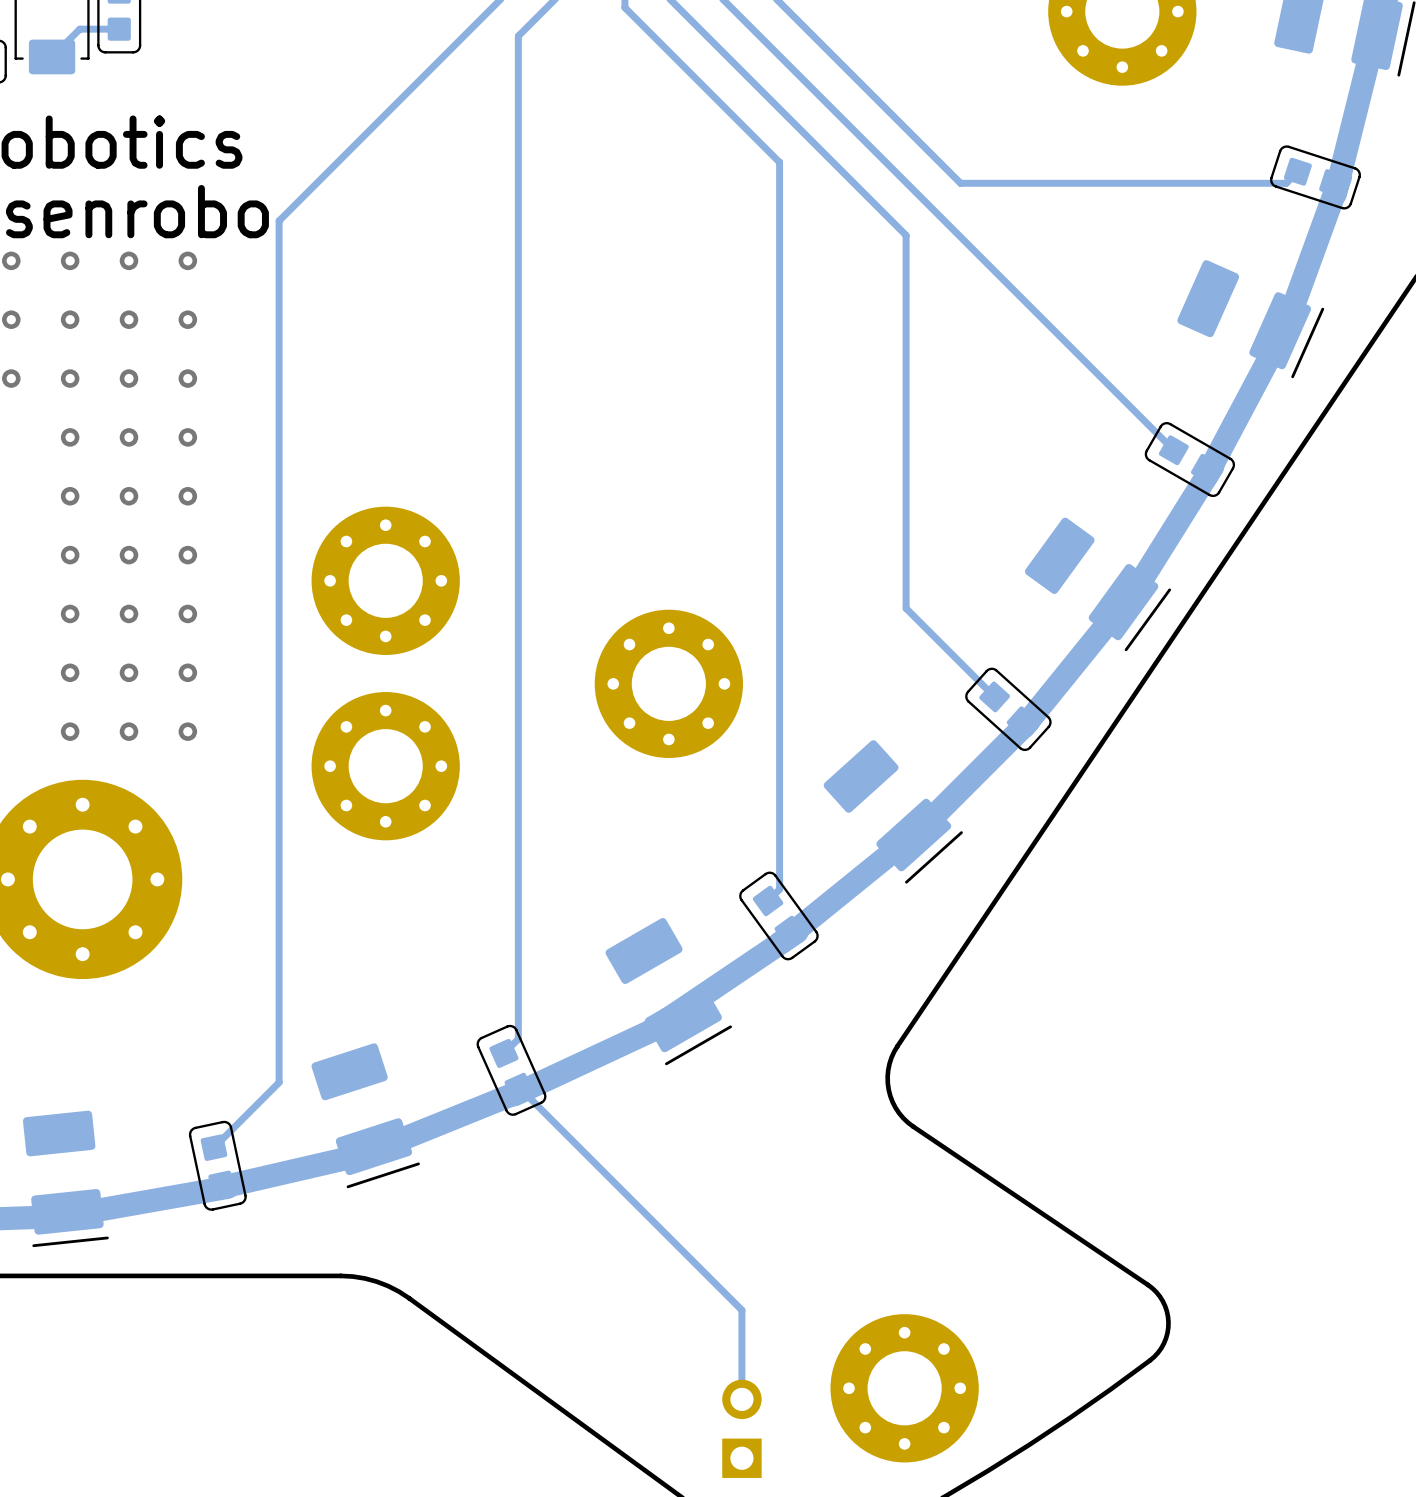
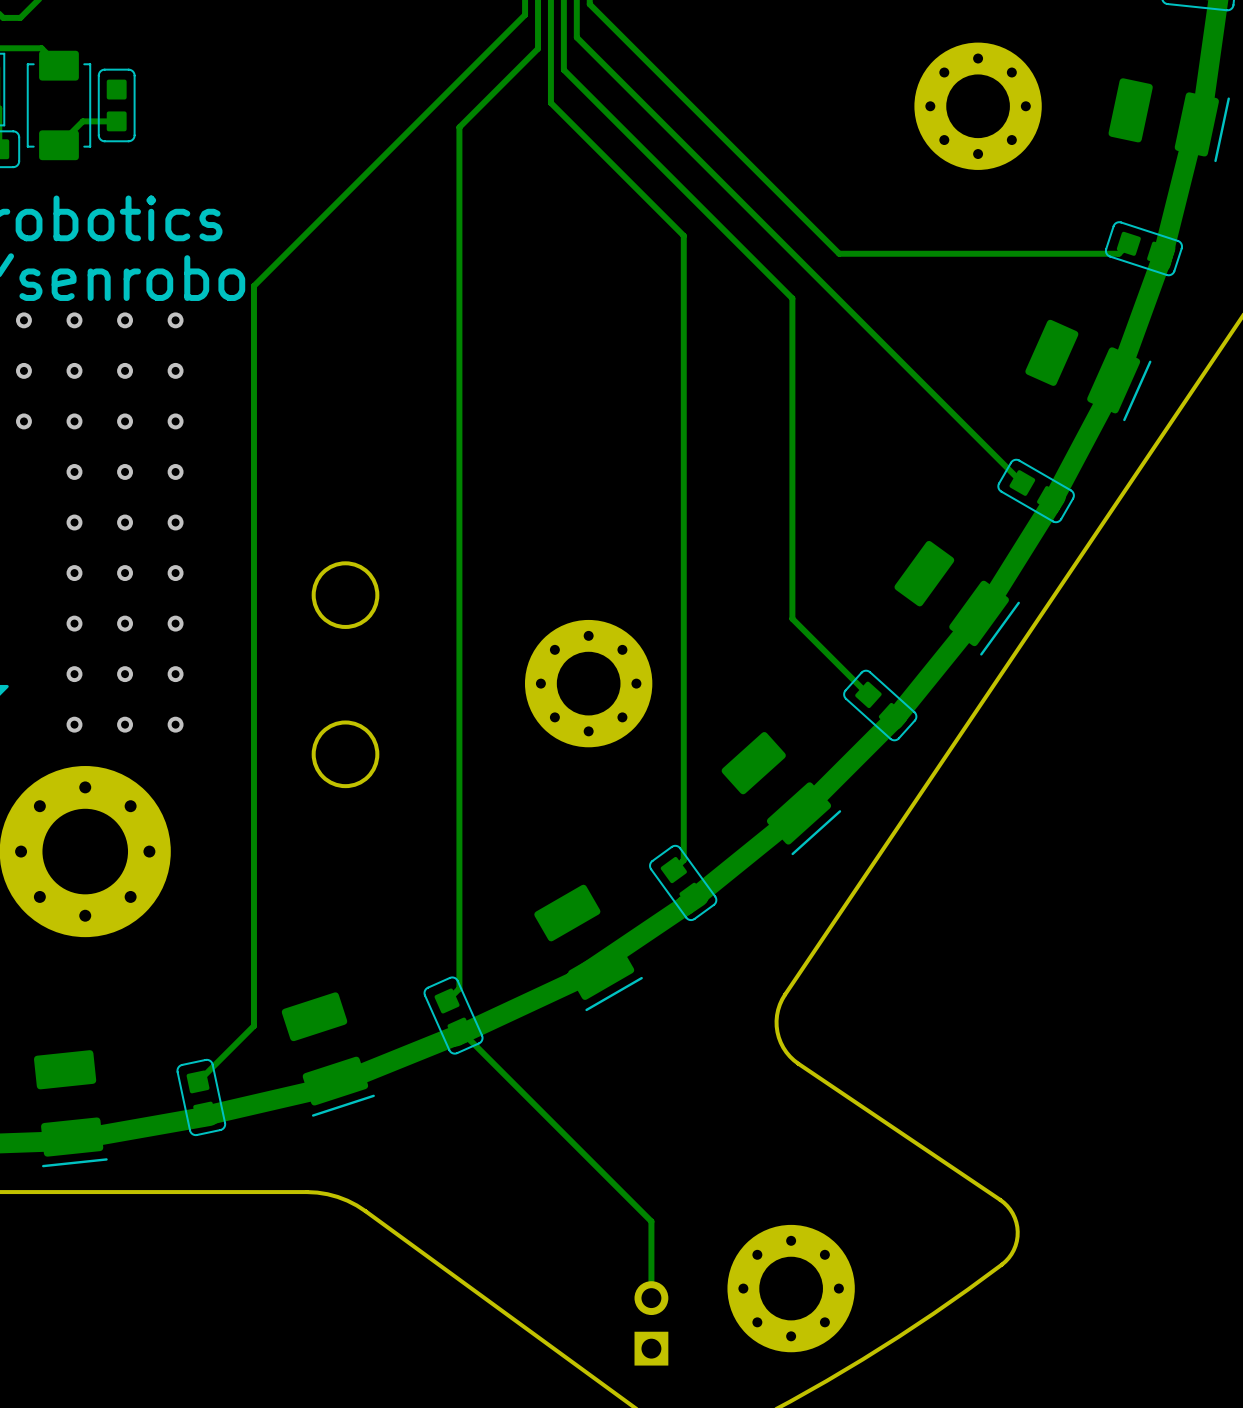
round board edge: none -> [311, 561, 380, 629]
part: (385, 580) -> none
round board edge: none -> [311, 720, 380, 789]
part: (385, 766) -> none

